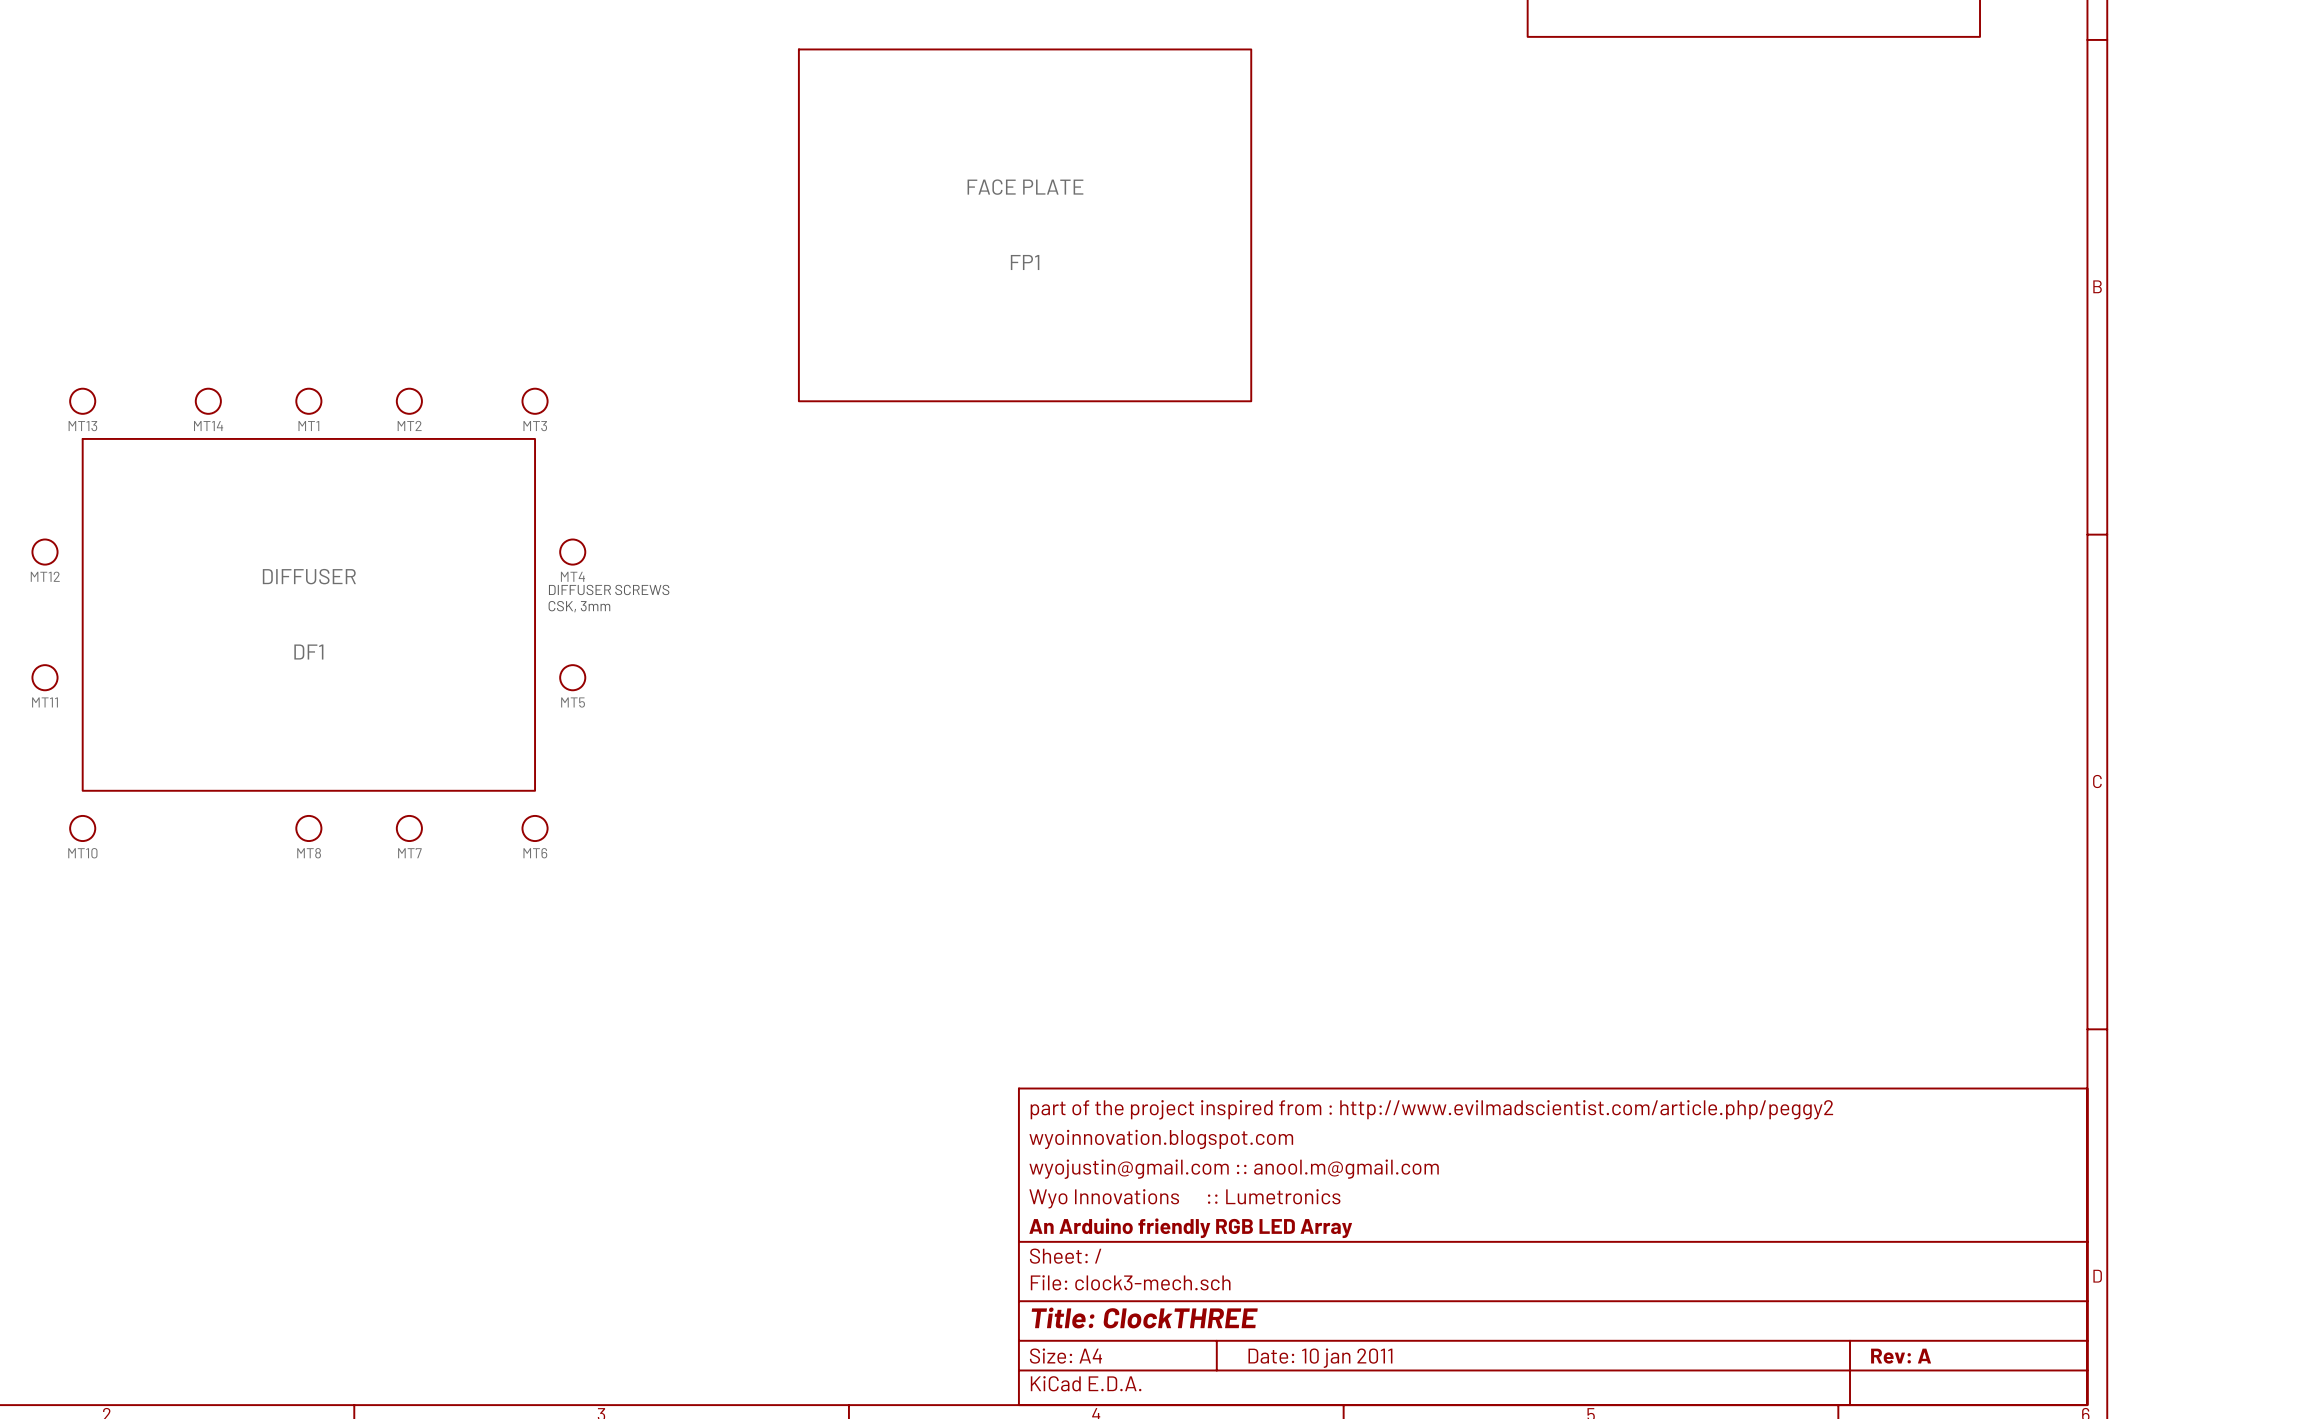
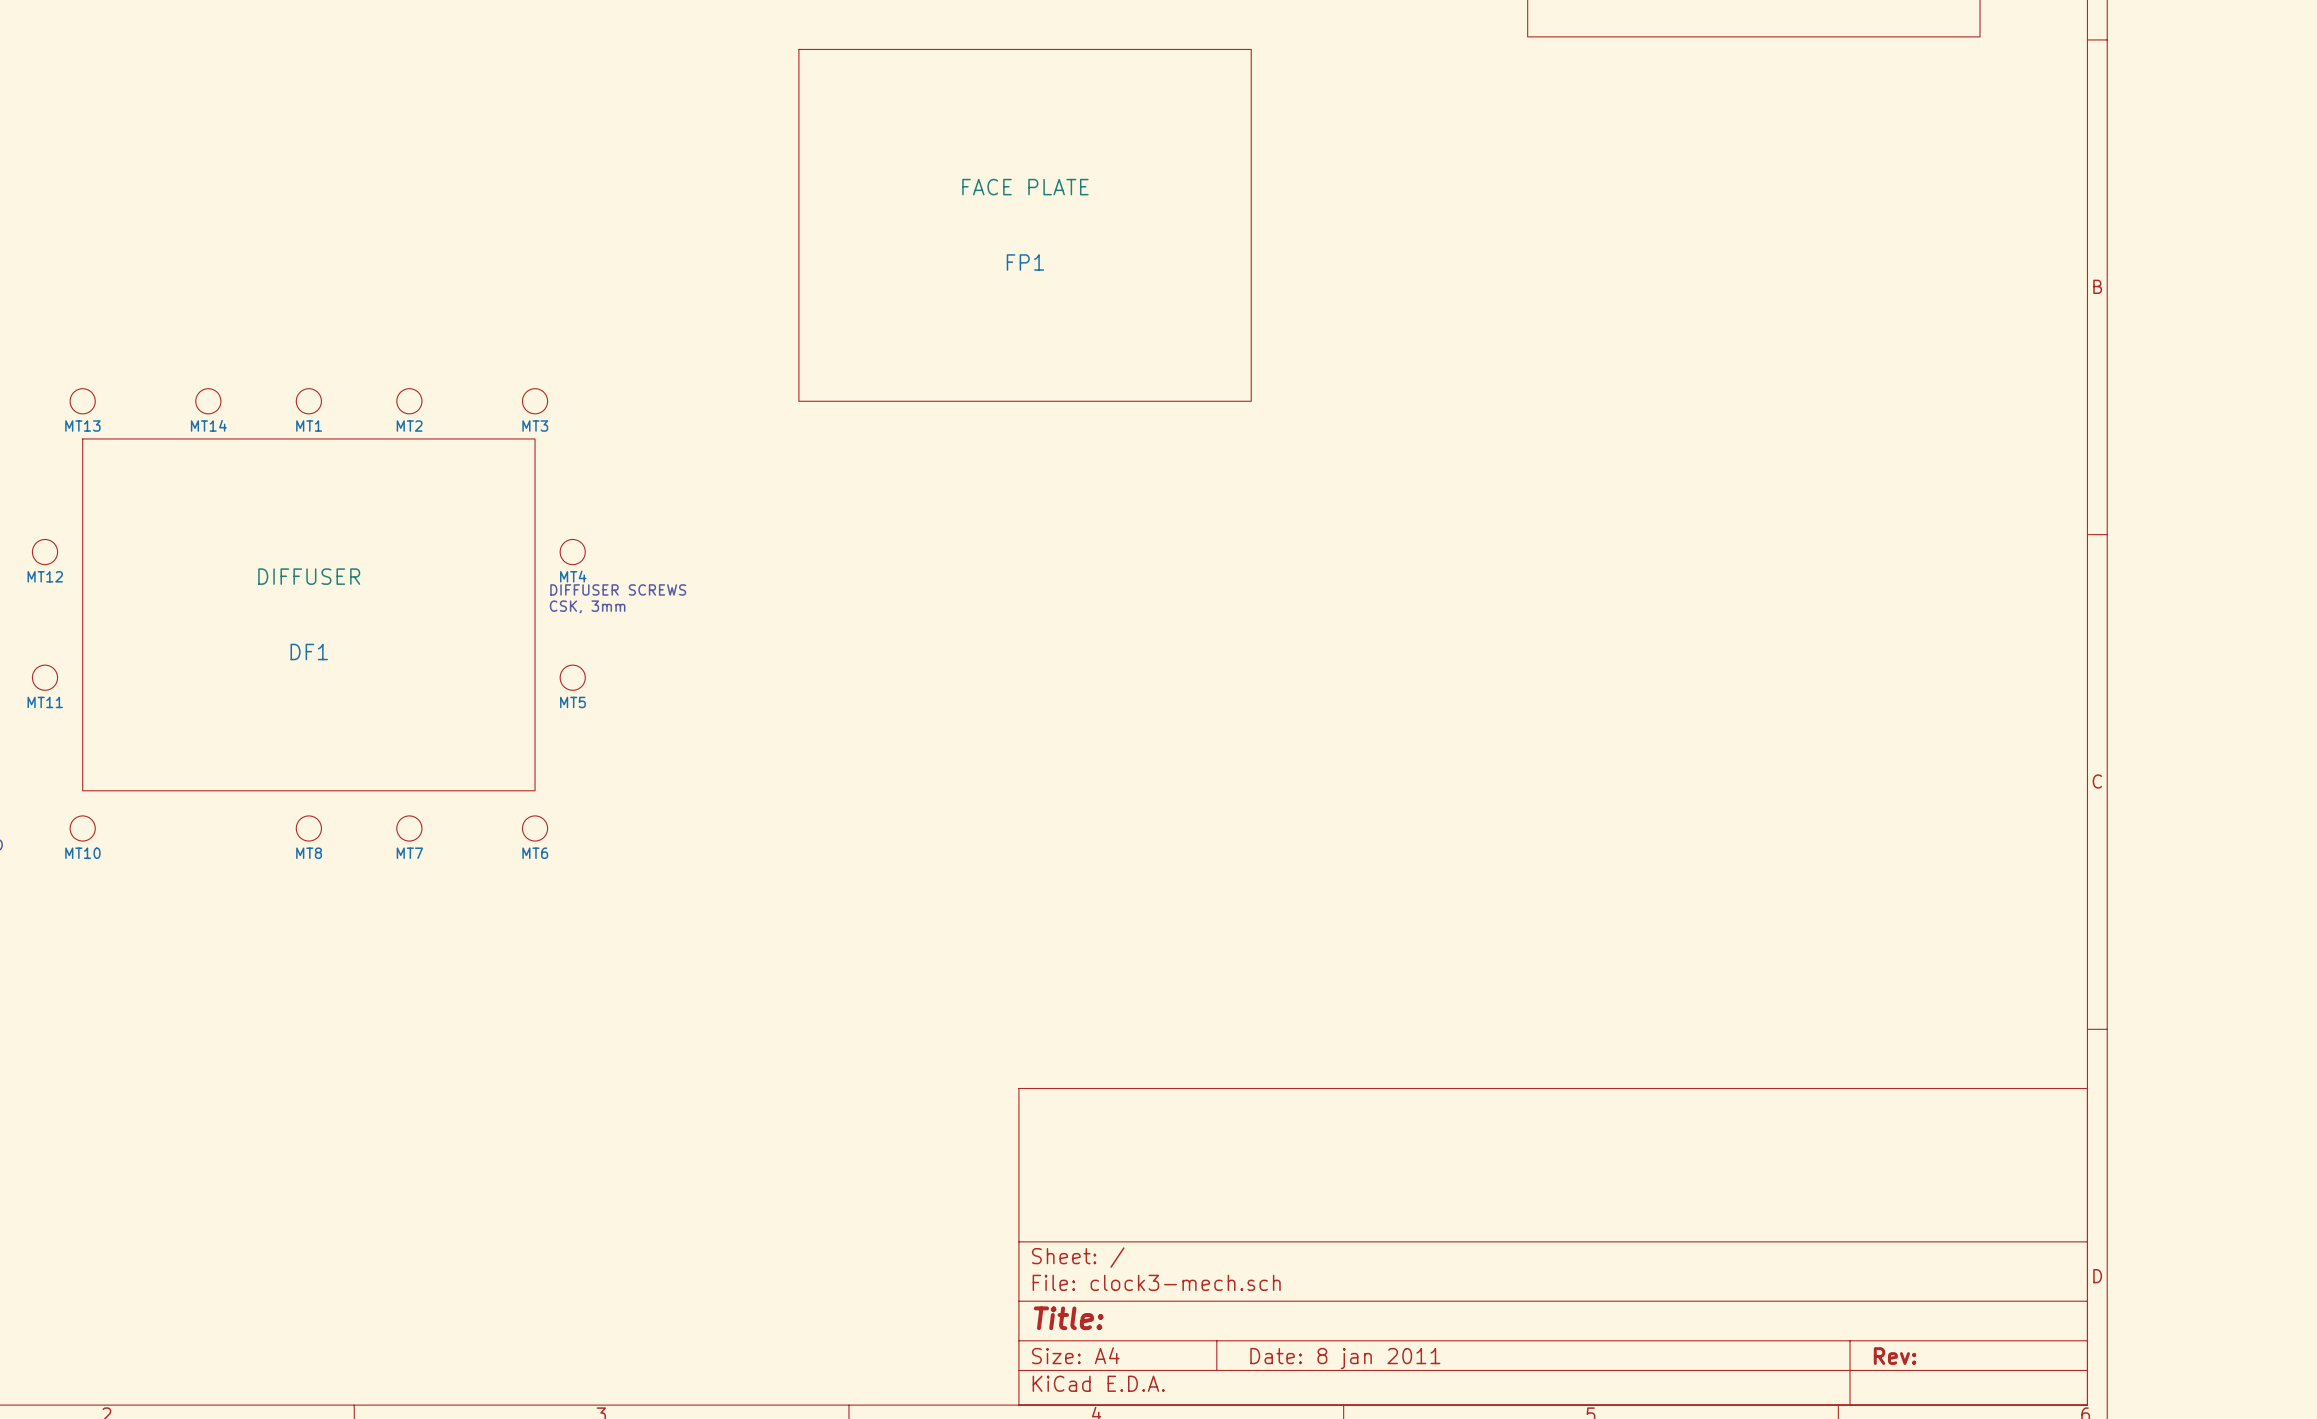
title block: part of the project inspired from : http://www.evilmadscientist.com/article.php/peggy2 (1431, 1109) -> none
title block: wyoinnovation.blogspot.com (1161, 1139) -> none
title block: wyojustin@gmail.com :: anool.m@gmail.com (1234, 1169) -> none
title block: Wyo Innovations :: Lumetronics (1184, 1198) -> none
title block: An Arduino friendly RGB LED Array (1190, 1228) -> none
title block: Title: ClockTHREE (1144, 1317) -> Title: (1068, 1318)
title block: Rev: A (1901, 1356) -> Rev: (1895, 1356)
title block: Date: 10 jan 2011 (1320, 1358) -> Date: 8 jan 2011 (1345, 1358)

